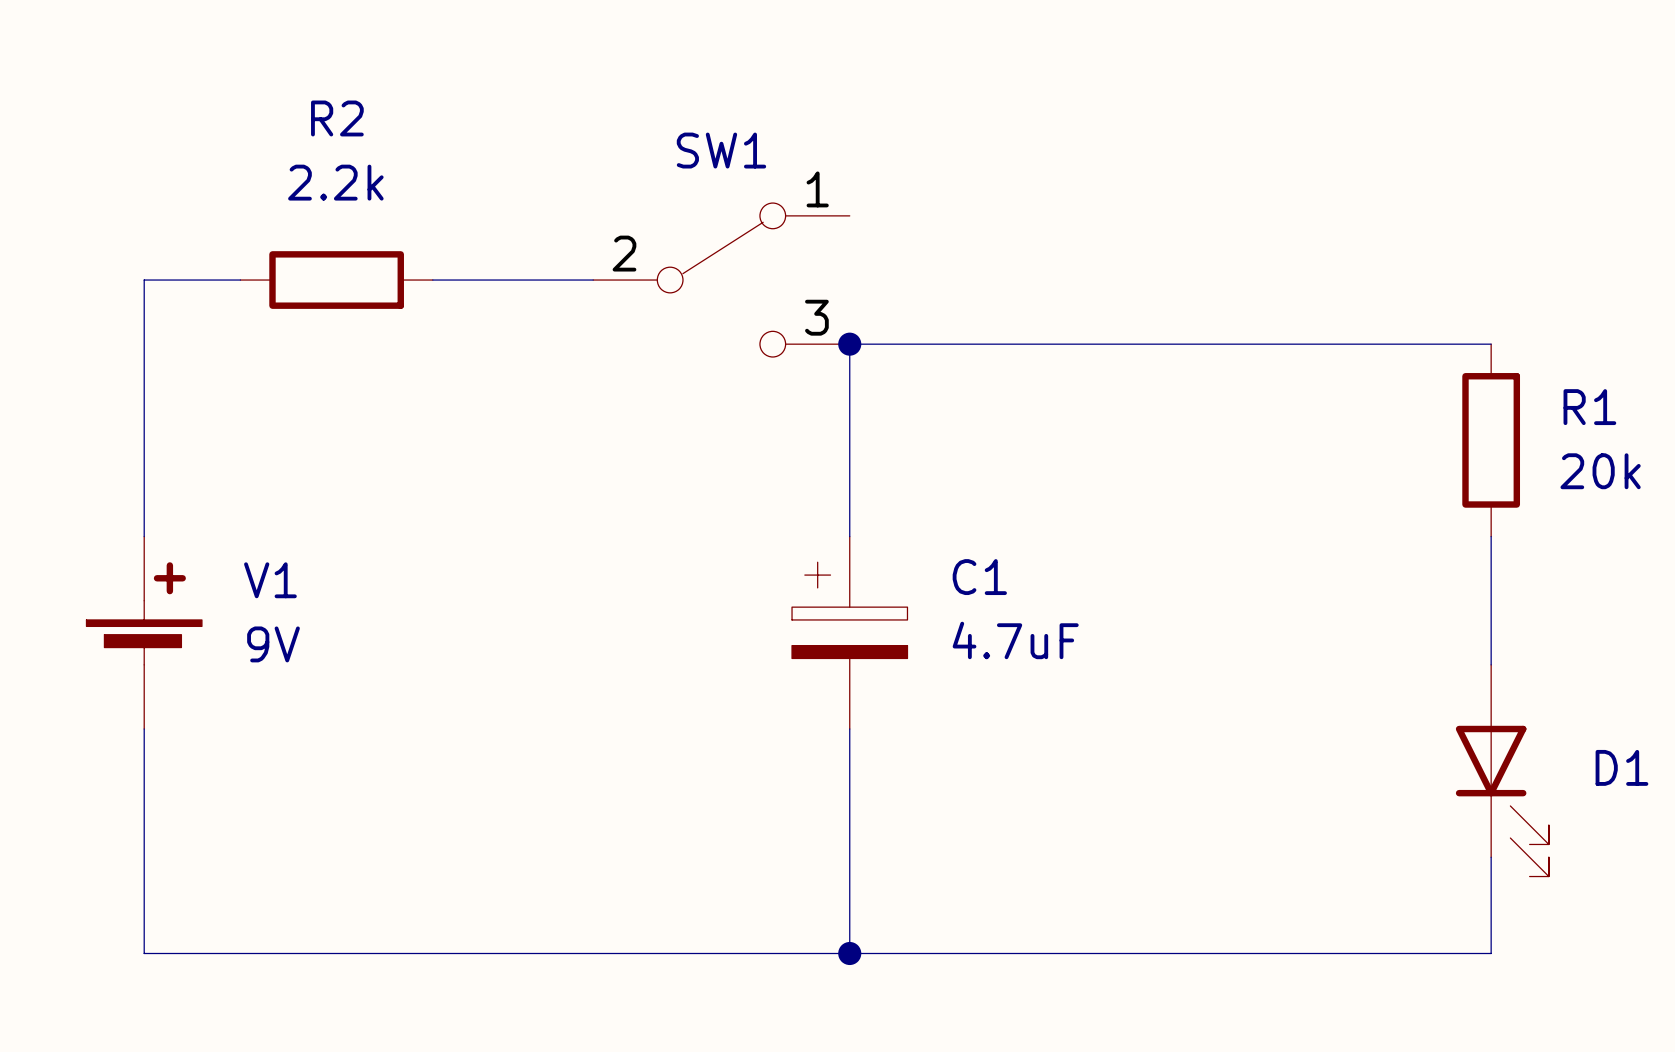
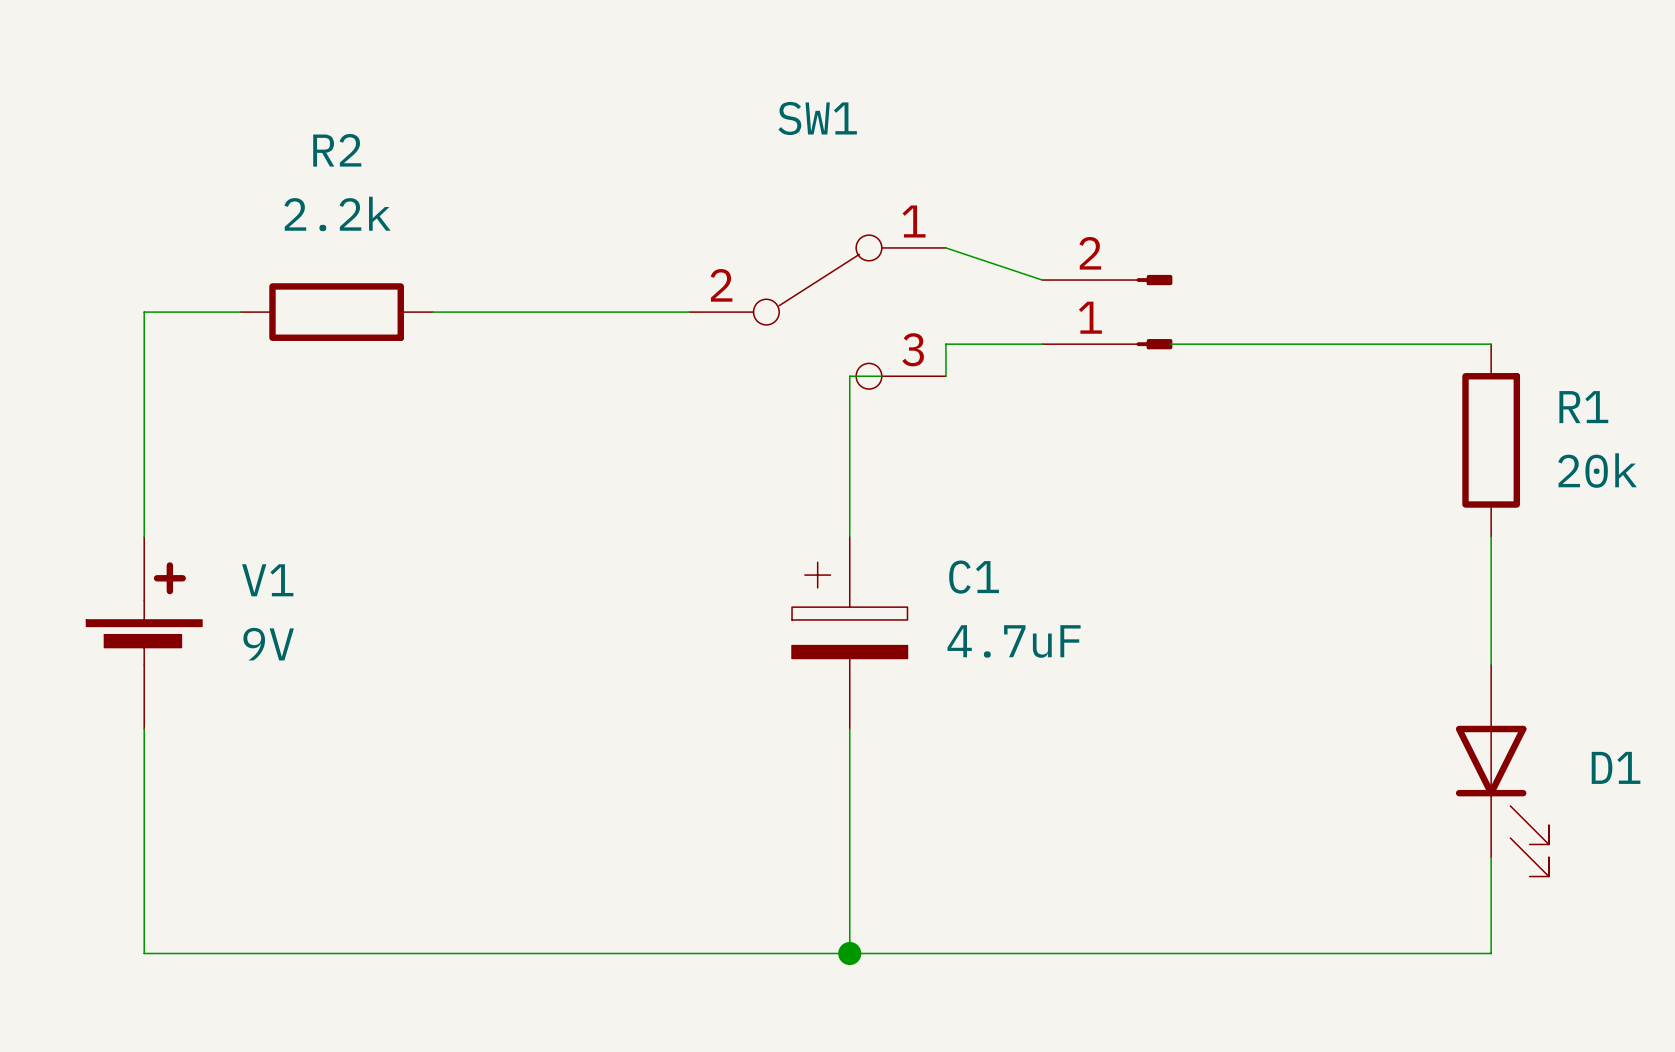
SW1 name position: SW1 (721, 150) -> SW1 (817, 118)
wire: none -> (945, 247) (1042, 280)
wire: (240, 280) (144, 280) (144, 312) -> (240, 312) (144, 312)
R2 position: (336, 280) -> (336, 312)
wire: (432, 280) (593, 280) -> none
SW1 position: (721, 280) -> (817, 312)
wire: none -> (432, 312) (689, 312)
part: none -> (1107, 312)
junction: (849, 344) -> none
wire: (945, 344) (849, 344) (849, 376) -> (881, 376) (849, 376)
wire: none -> (945, 344) (945, 376)

